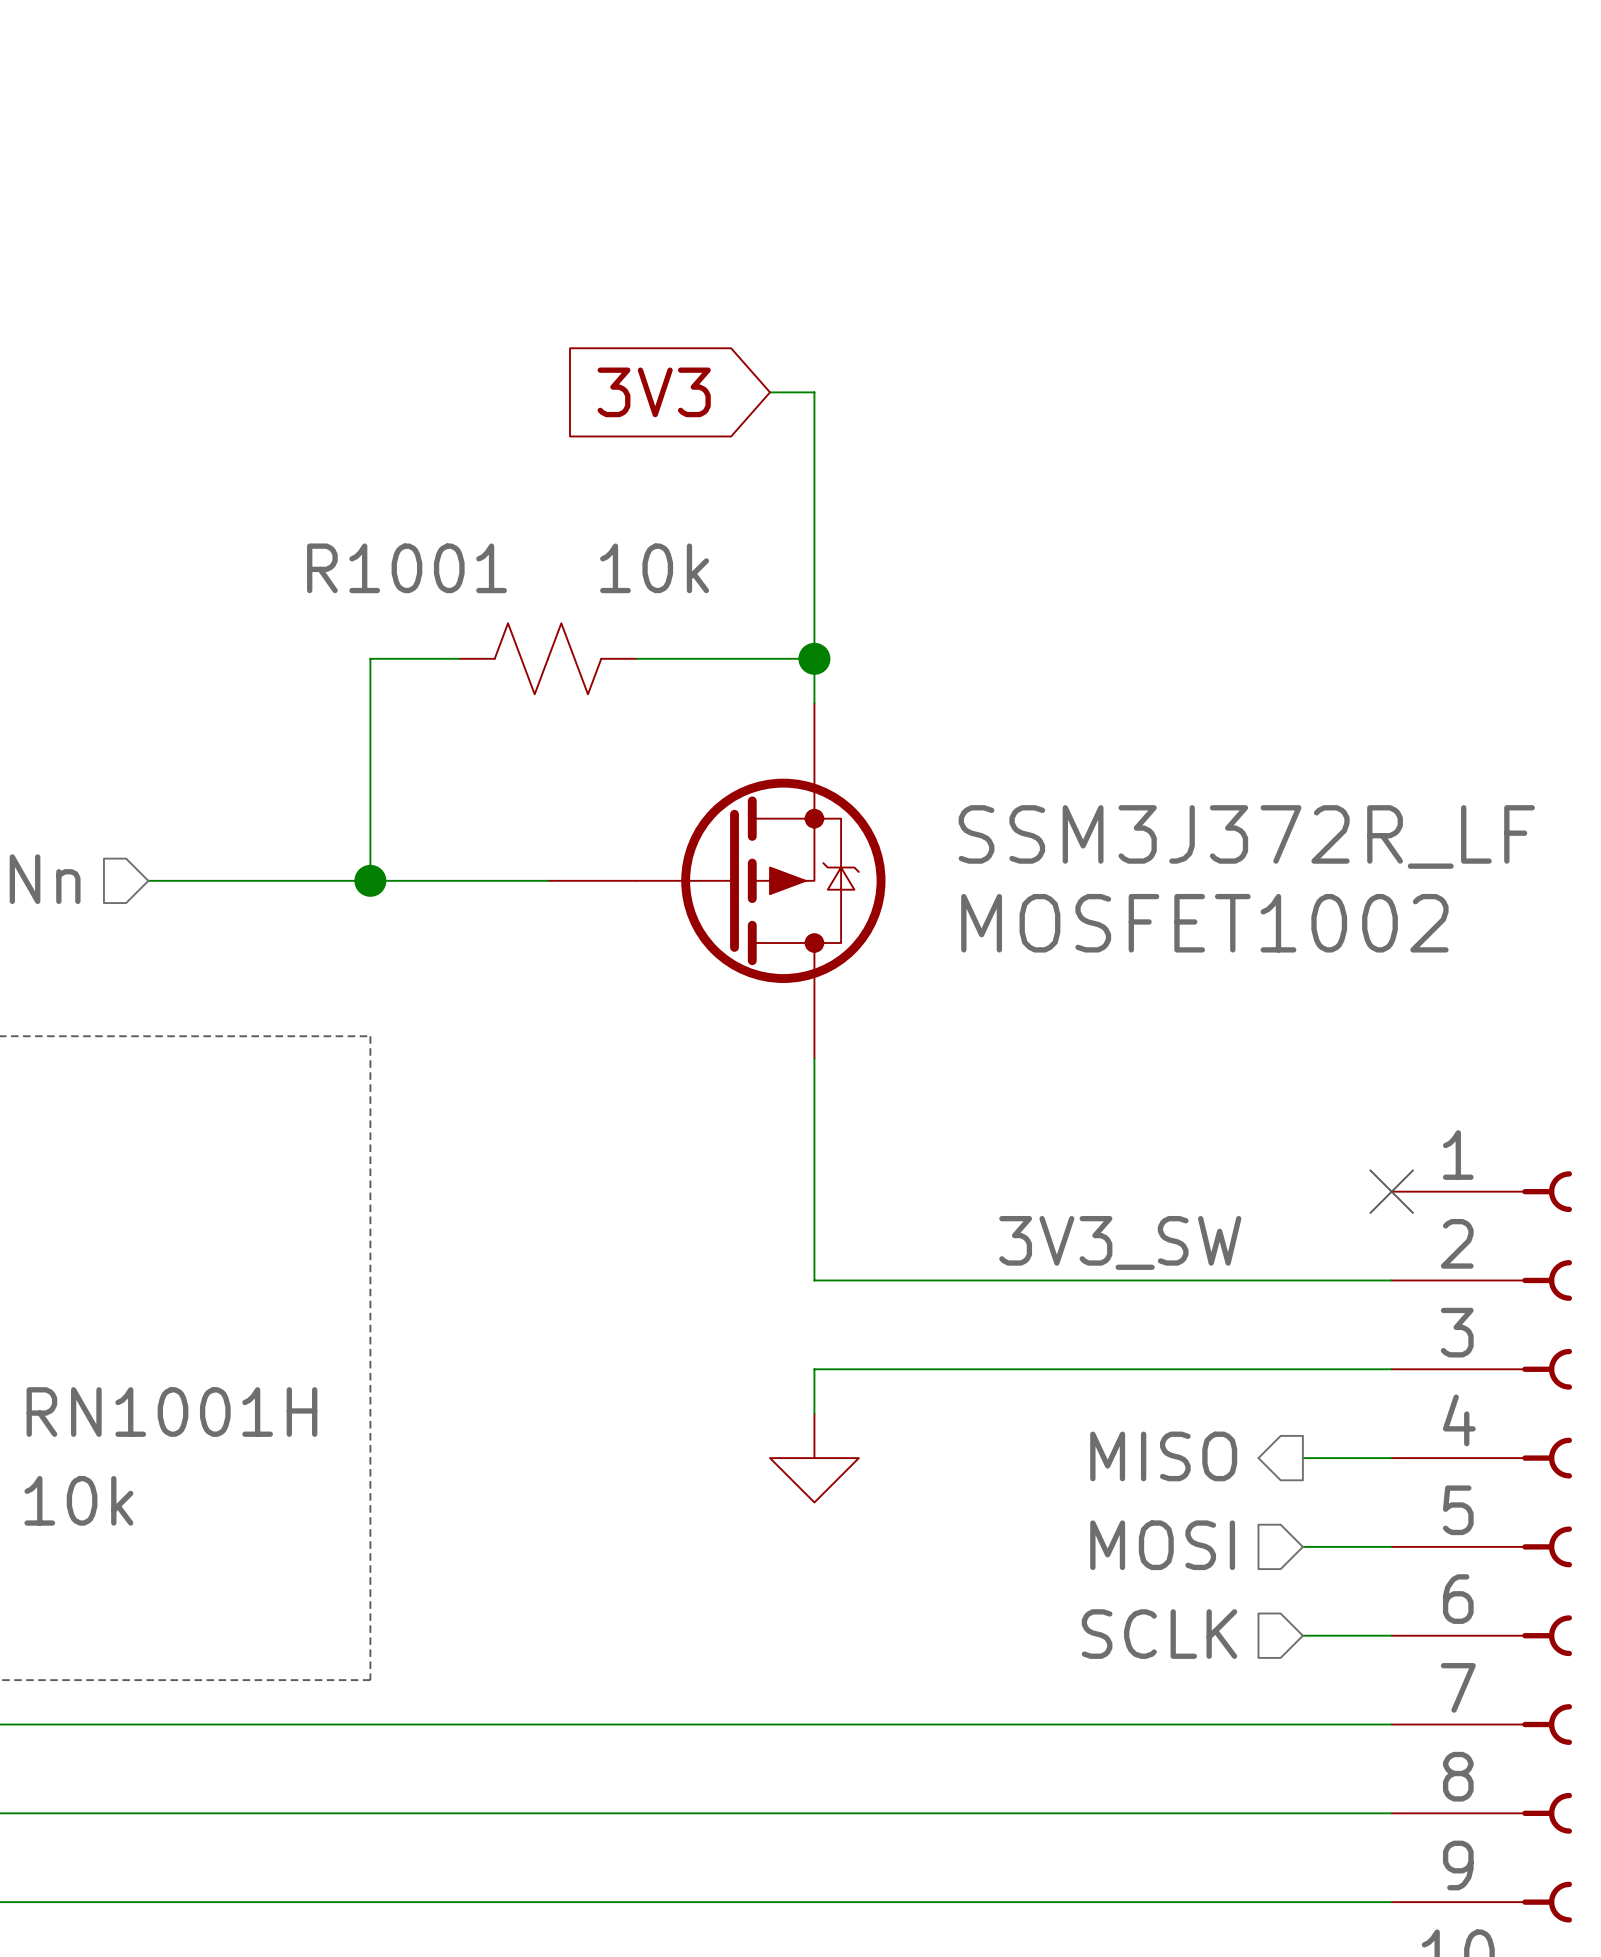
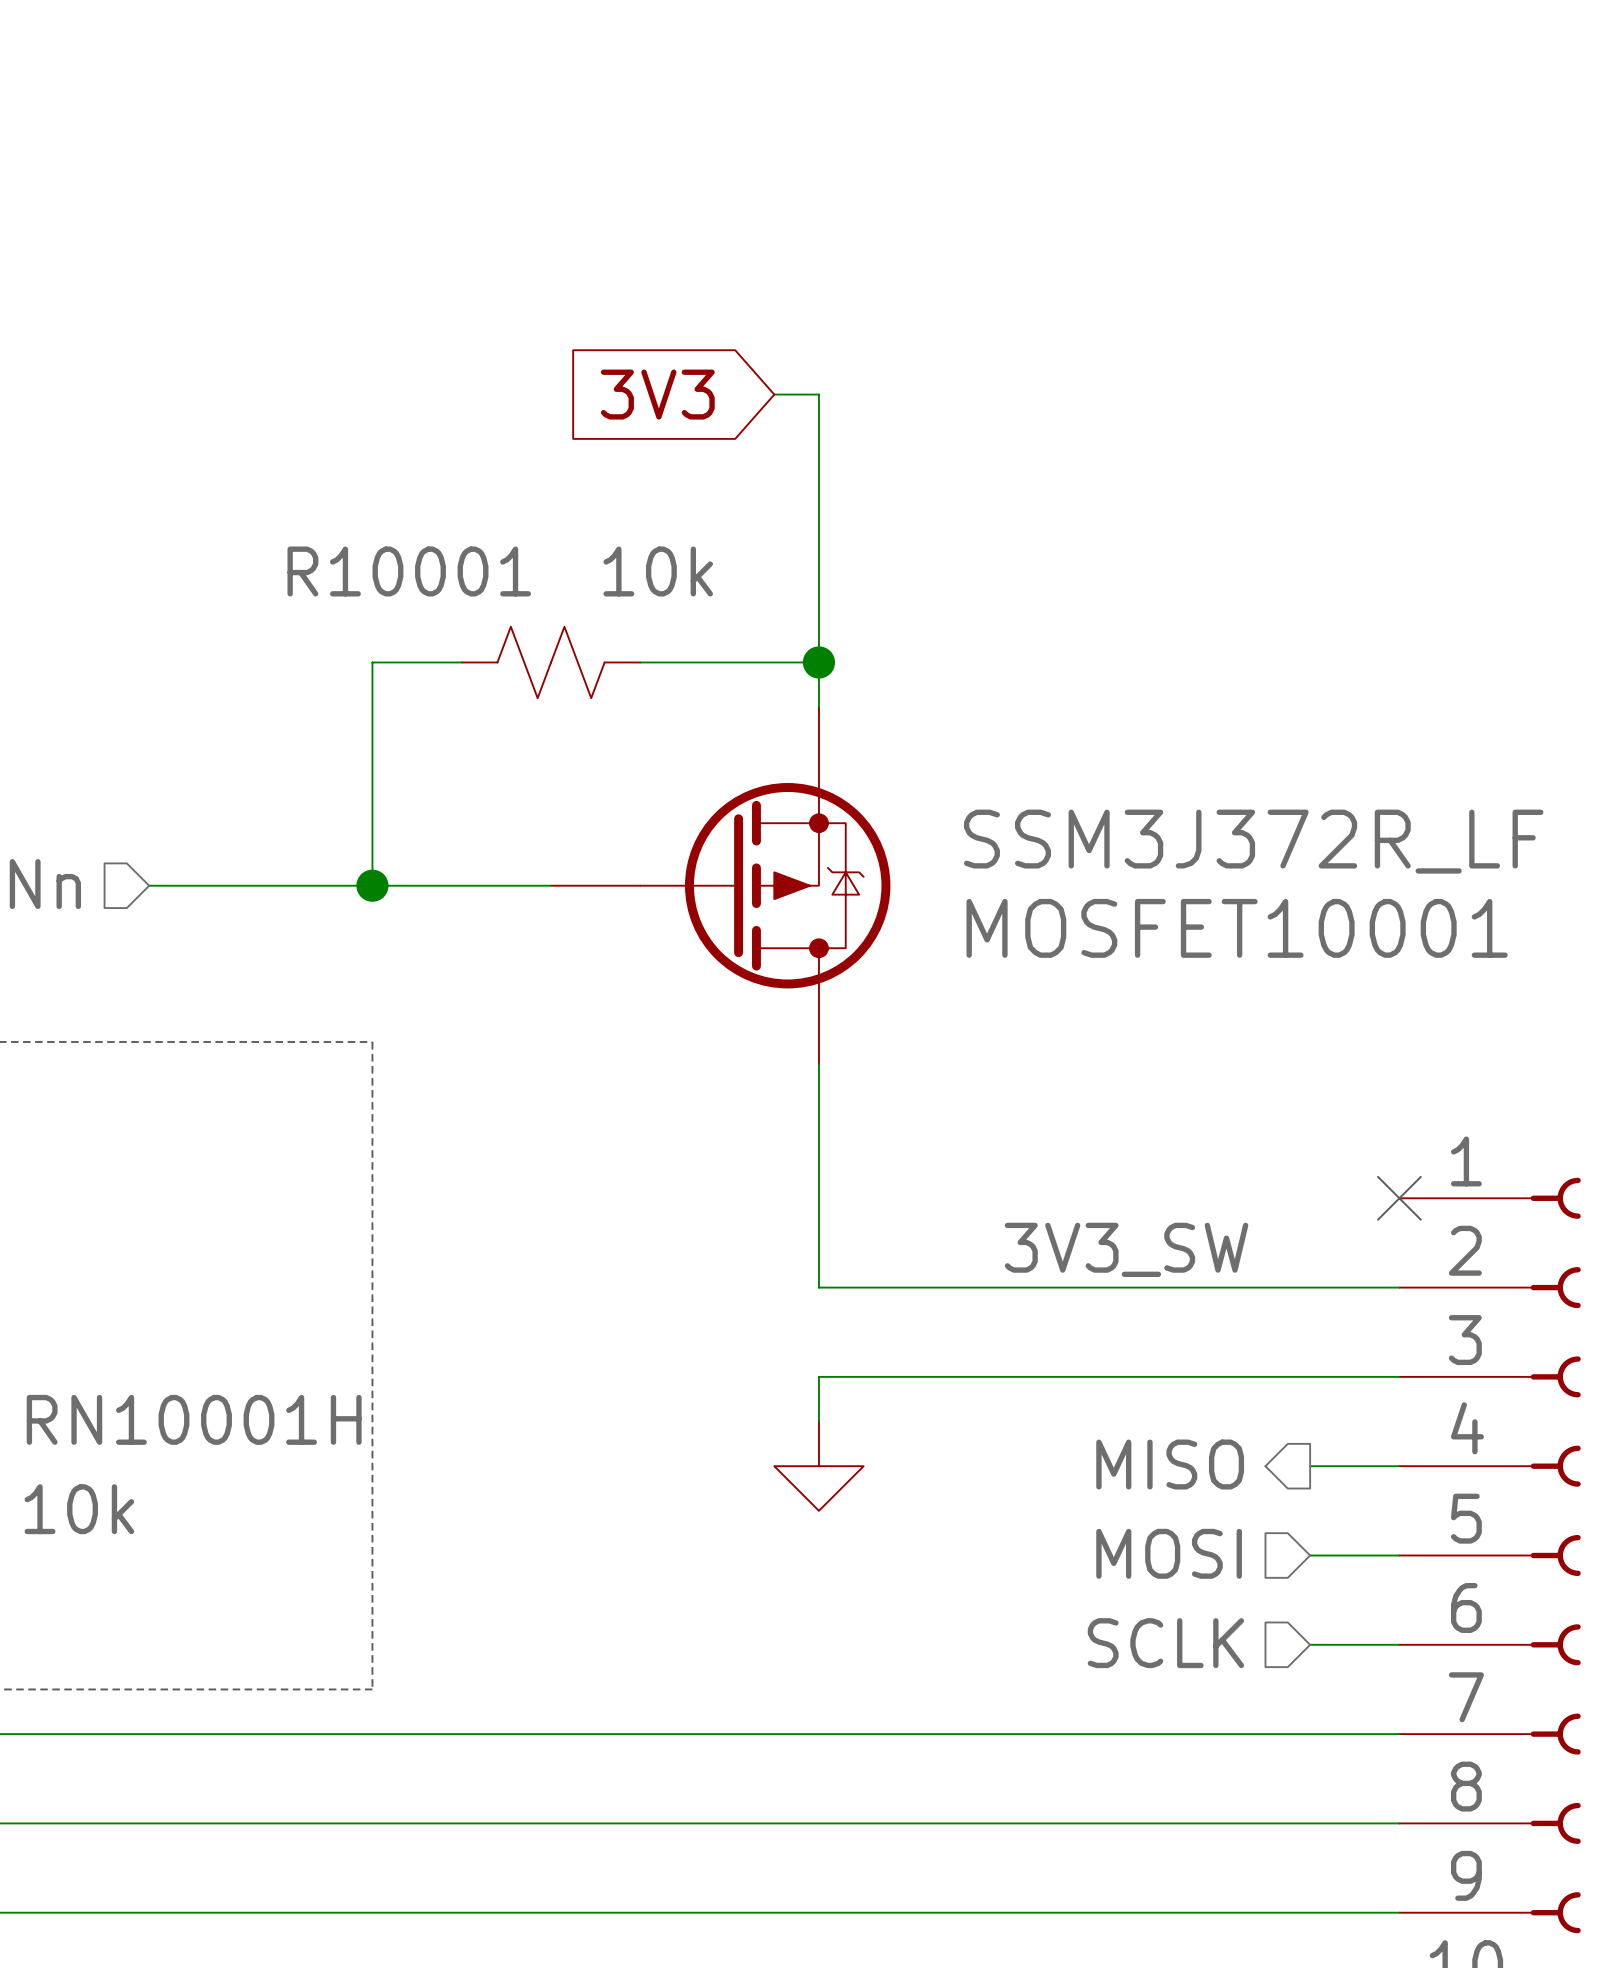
R1001 name: R1001 (406, 568) -> R10001 (409, 571)
MOSFET1002 name: MOSFET1002 (1204, 923) -> MOSFET10001 (1237, 928)
RN1001H name: RN1001H (171, 1412) -> RN10001H (194, 1419)

